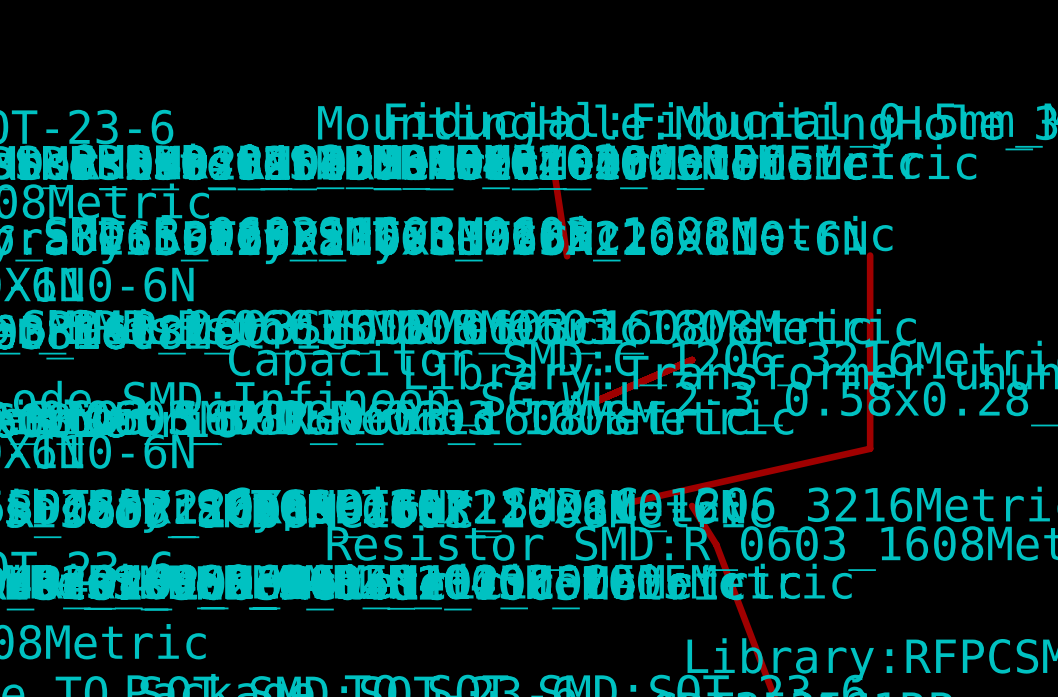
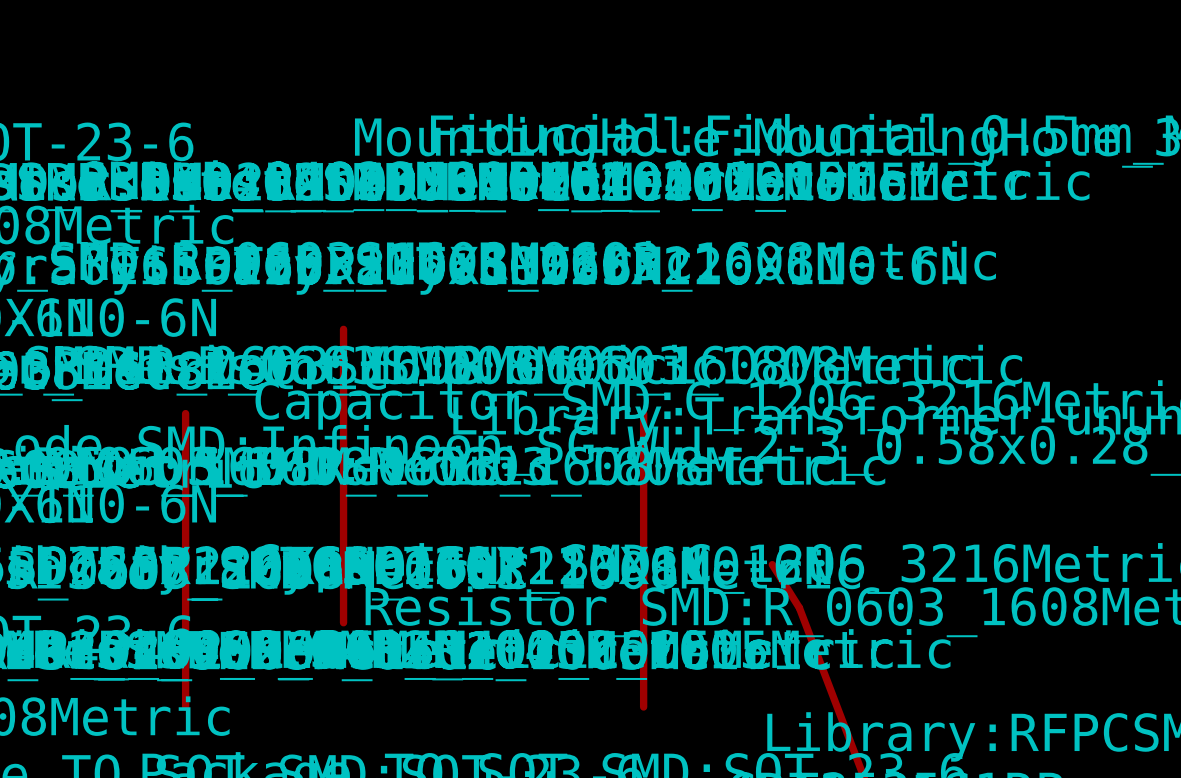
track: (553, 163) (567, 256) -> none
track: (870, 255) (870, 448) (614, 505) -> none
track: none -> (343, 329) (343, 622)
track: (692, 360) (598, 400) -> none
track: none -> (185, 413) (185, 707)
track: none -> (643, 413) (643, 707)

